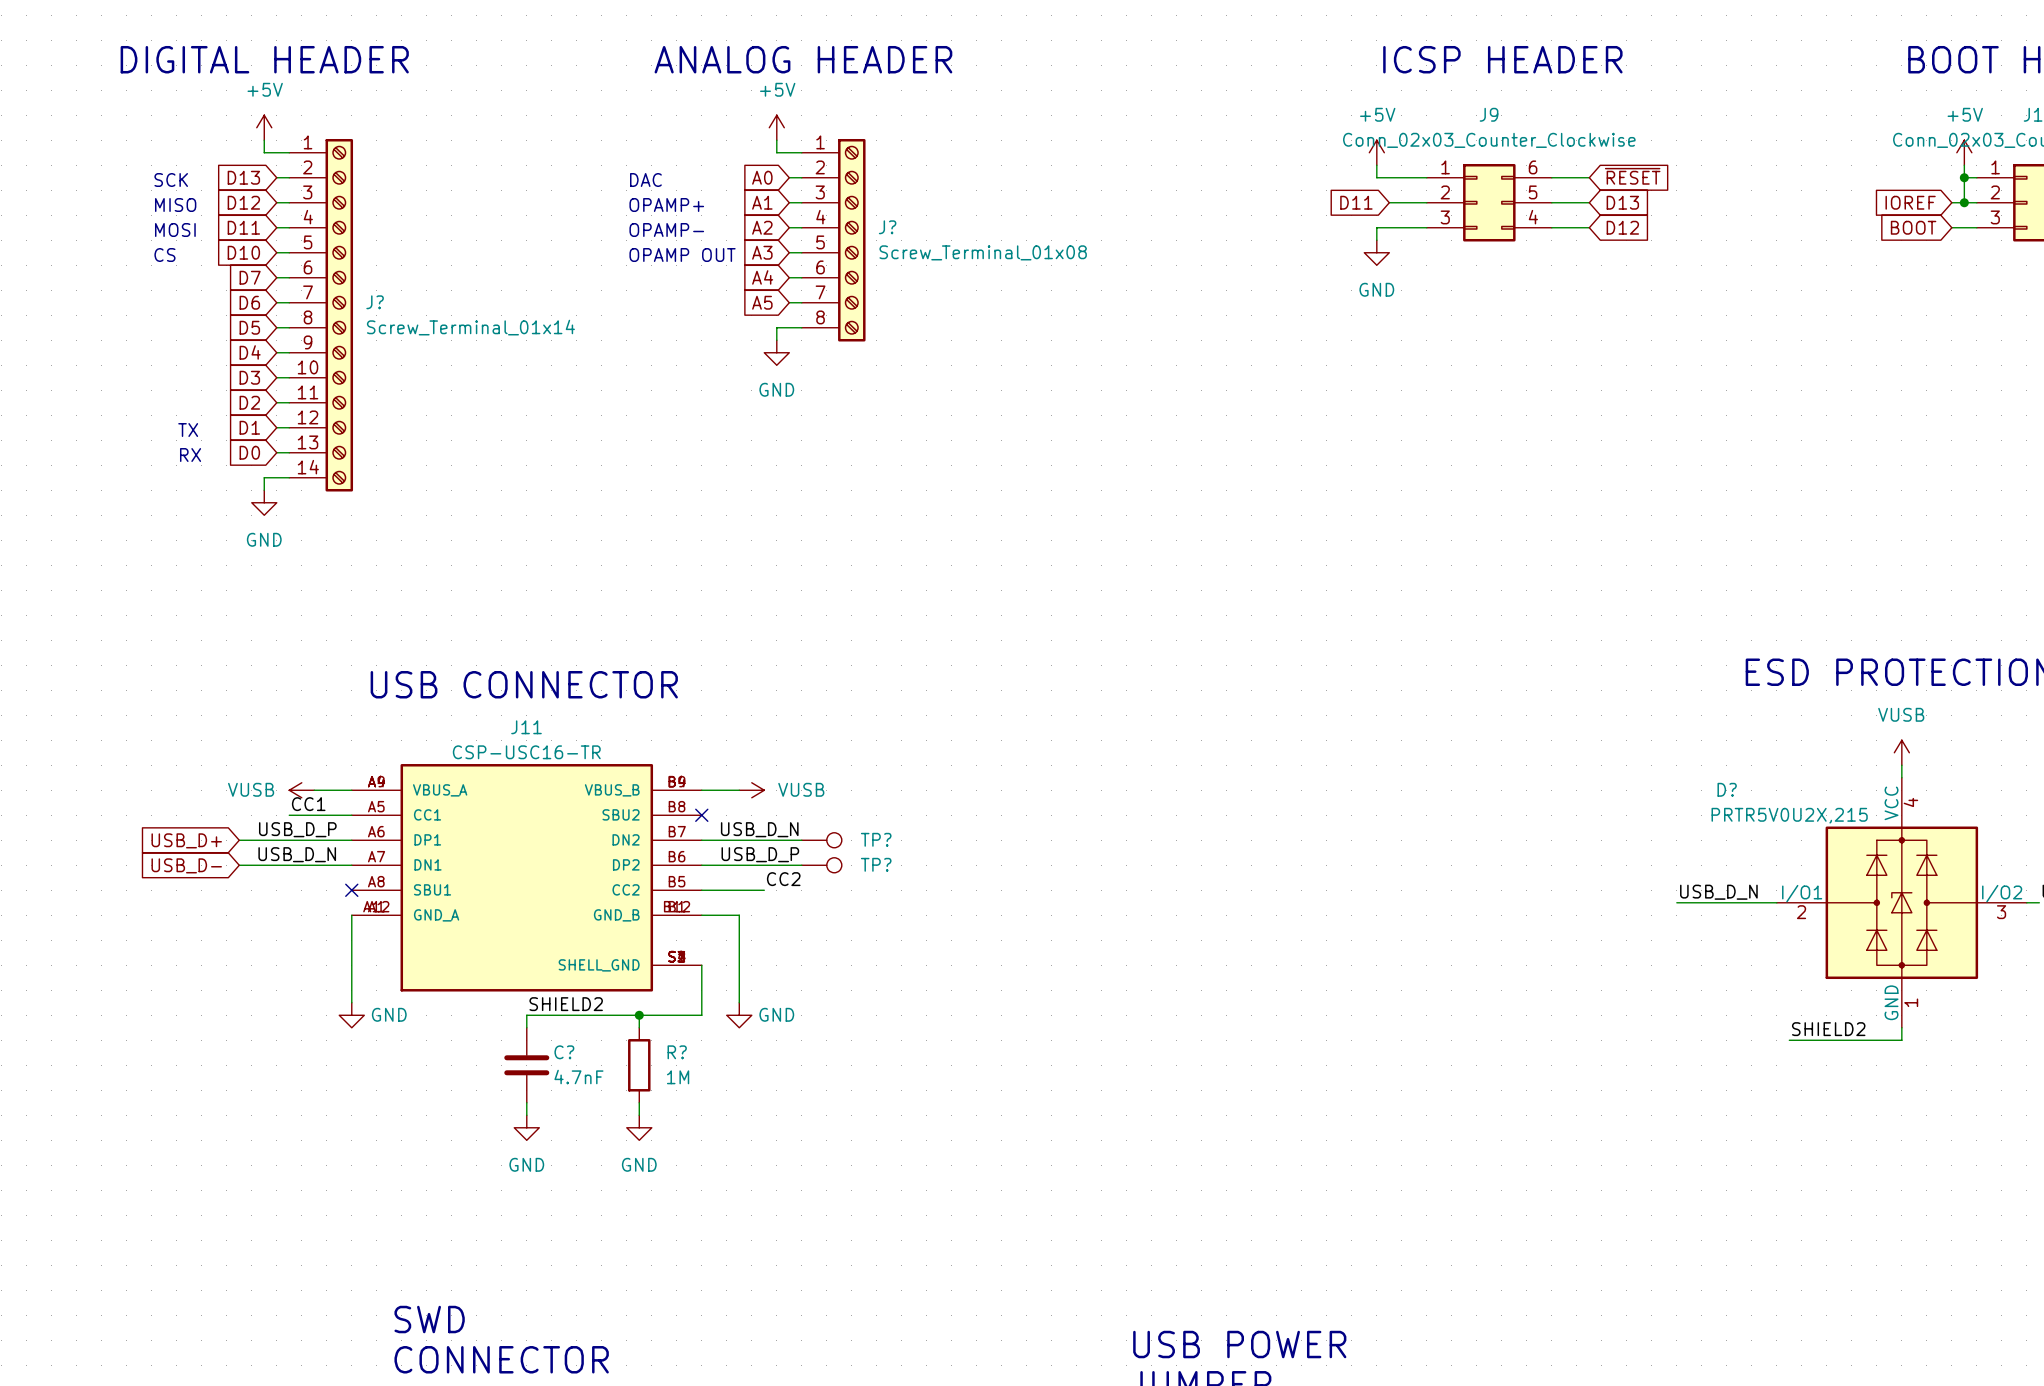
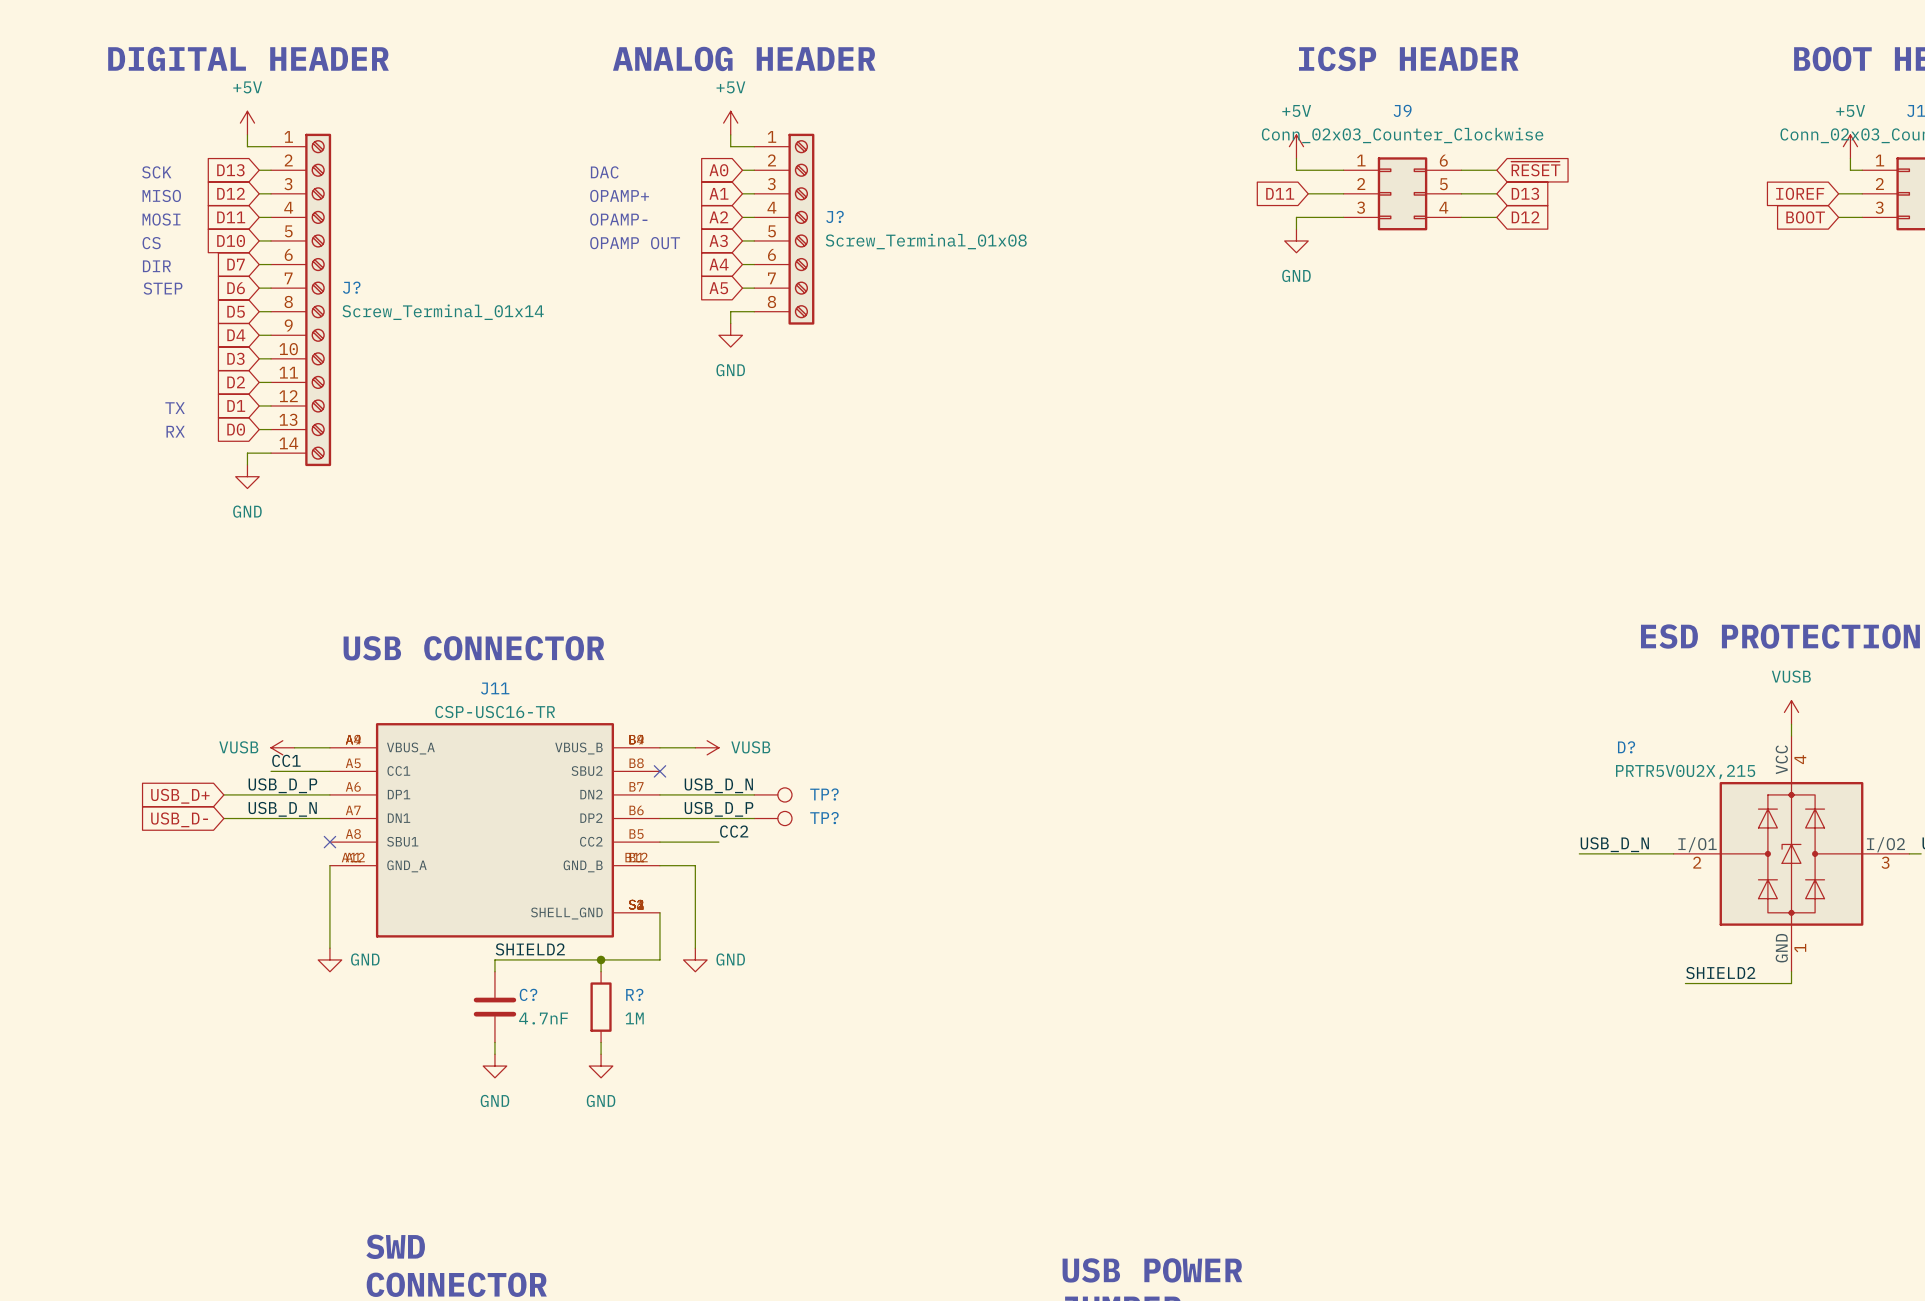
wire: (1964, 177) (1964, 202) -> none
junction: (1964, 177) -> none
junction: (1964, 202) -> none
text: none -> DIR (156, 266)
text: none -> STEP (163, 288)

